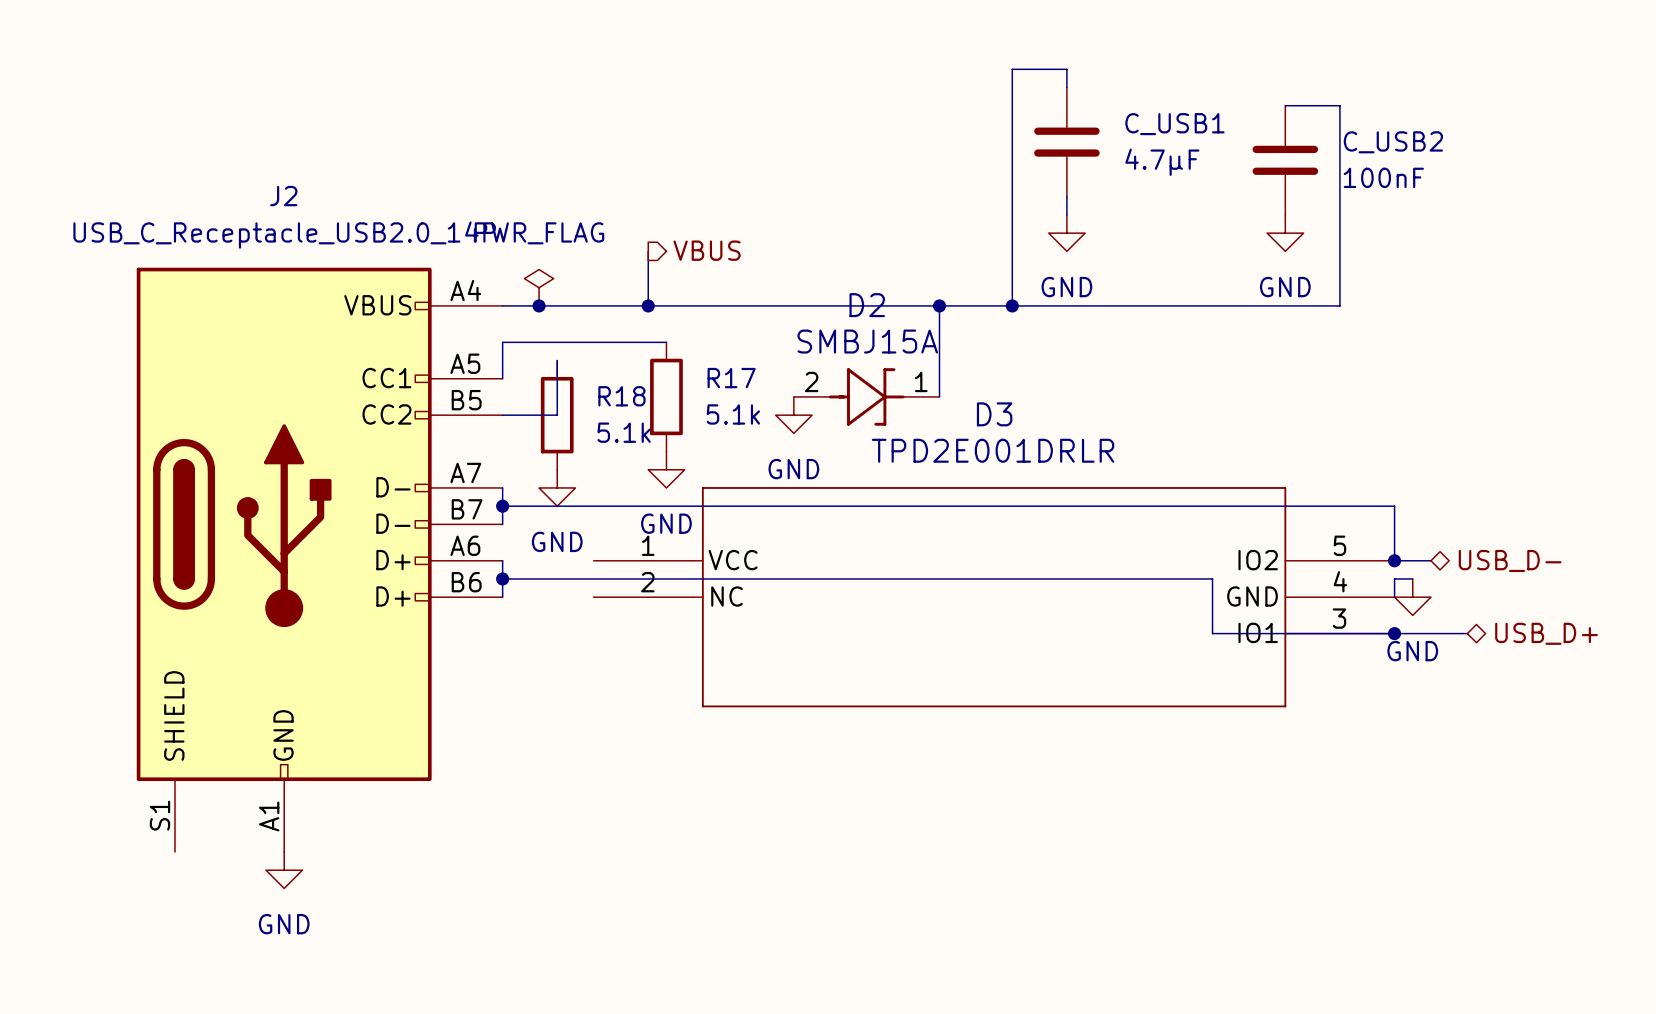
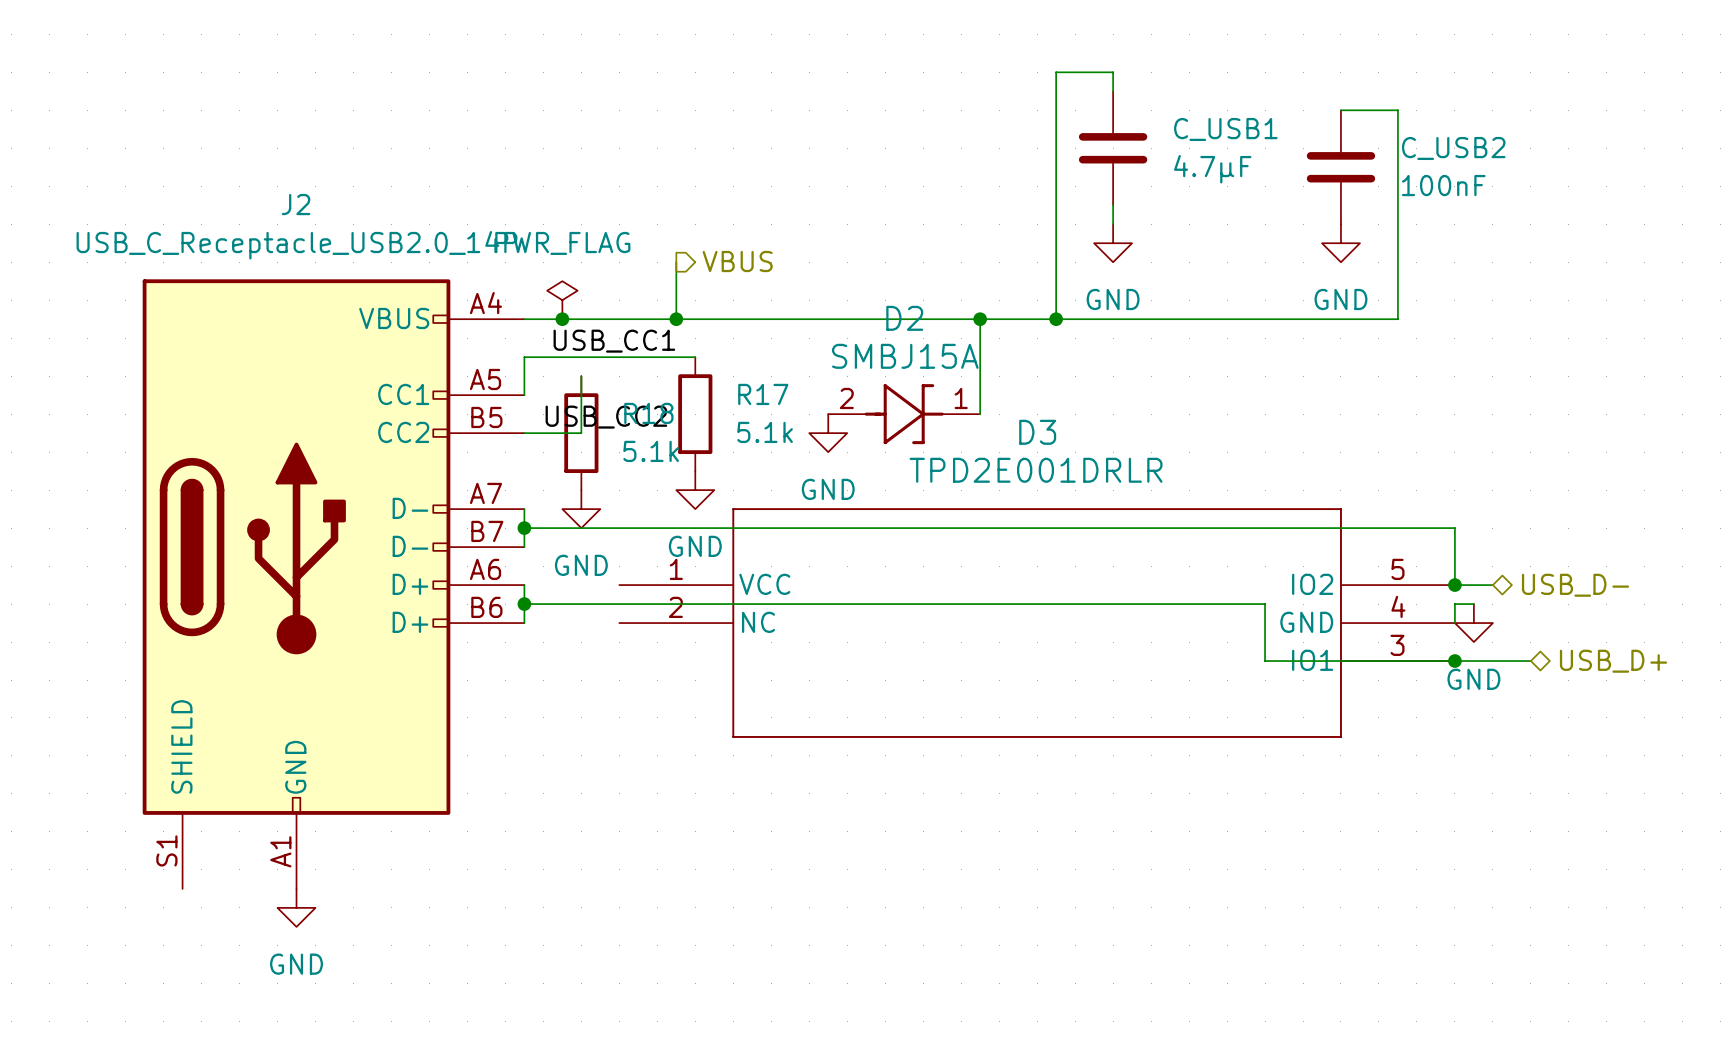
label: none -> USB_CC1 (614, 341)
label: none -> USB_CC2 (606, 417)

